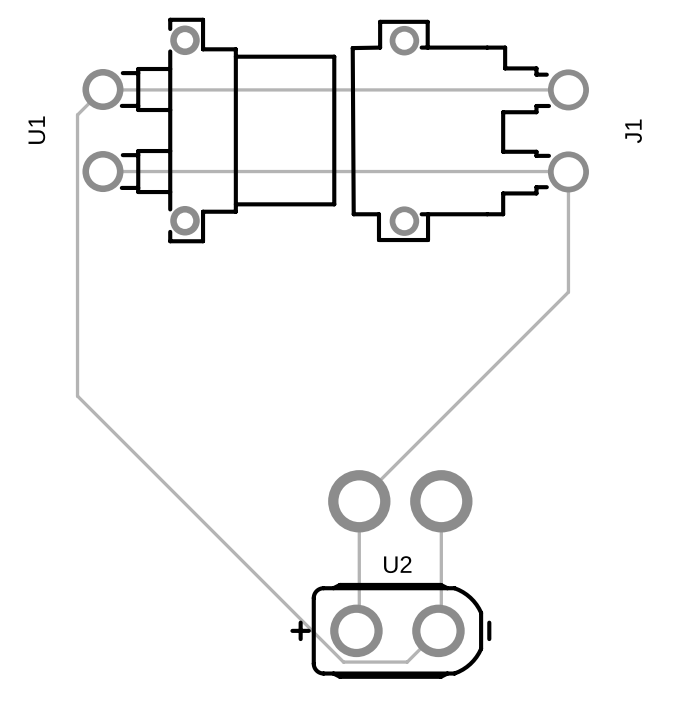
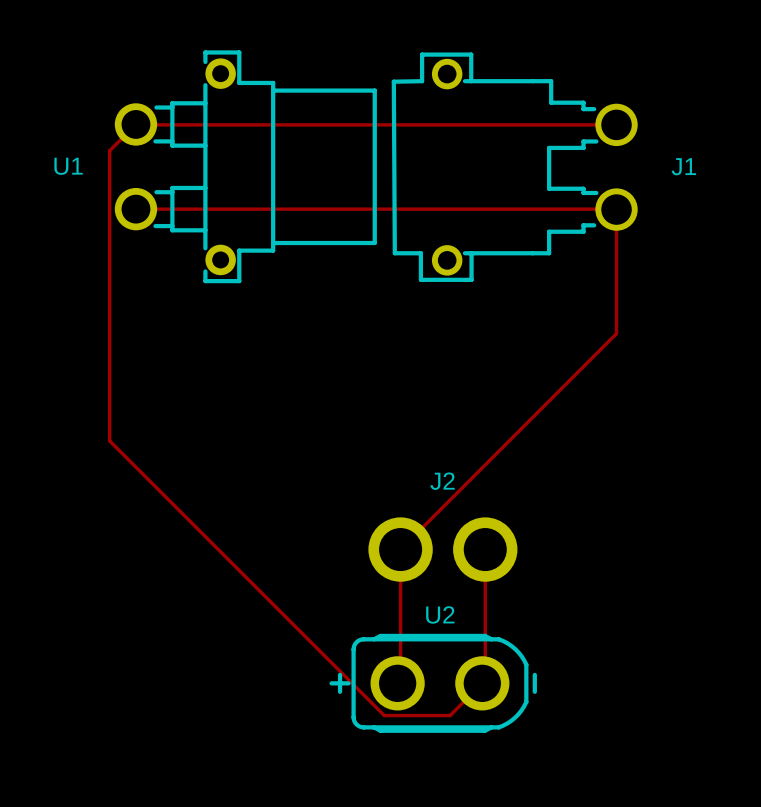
U1 name rotation: 0° (36, 130) -> 90° clockwise (68, 166)
J1 name rotation: 0° (633, 131) -> 90° clockwise (683, 166)
J2 name: none -> J2 (442, 481)

